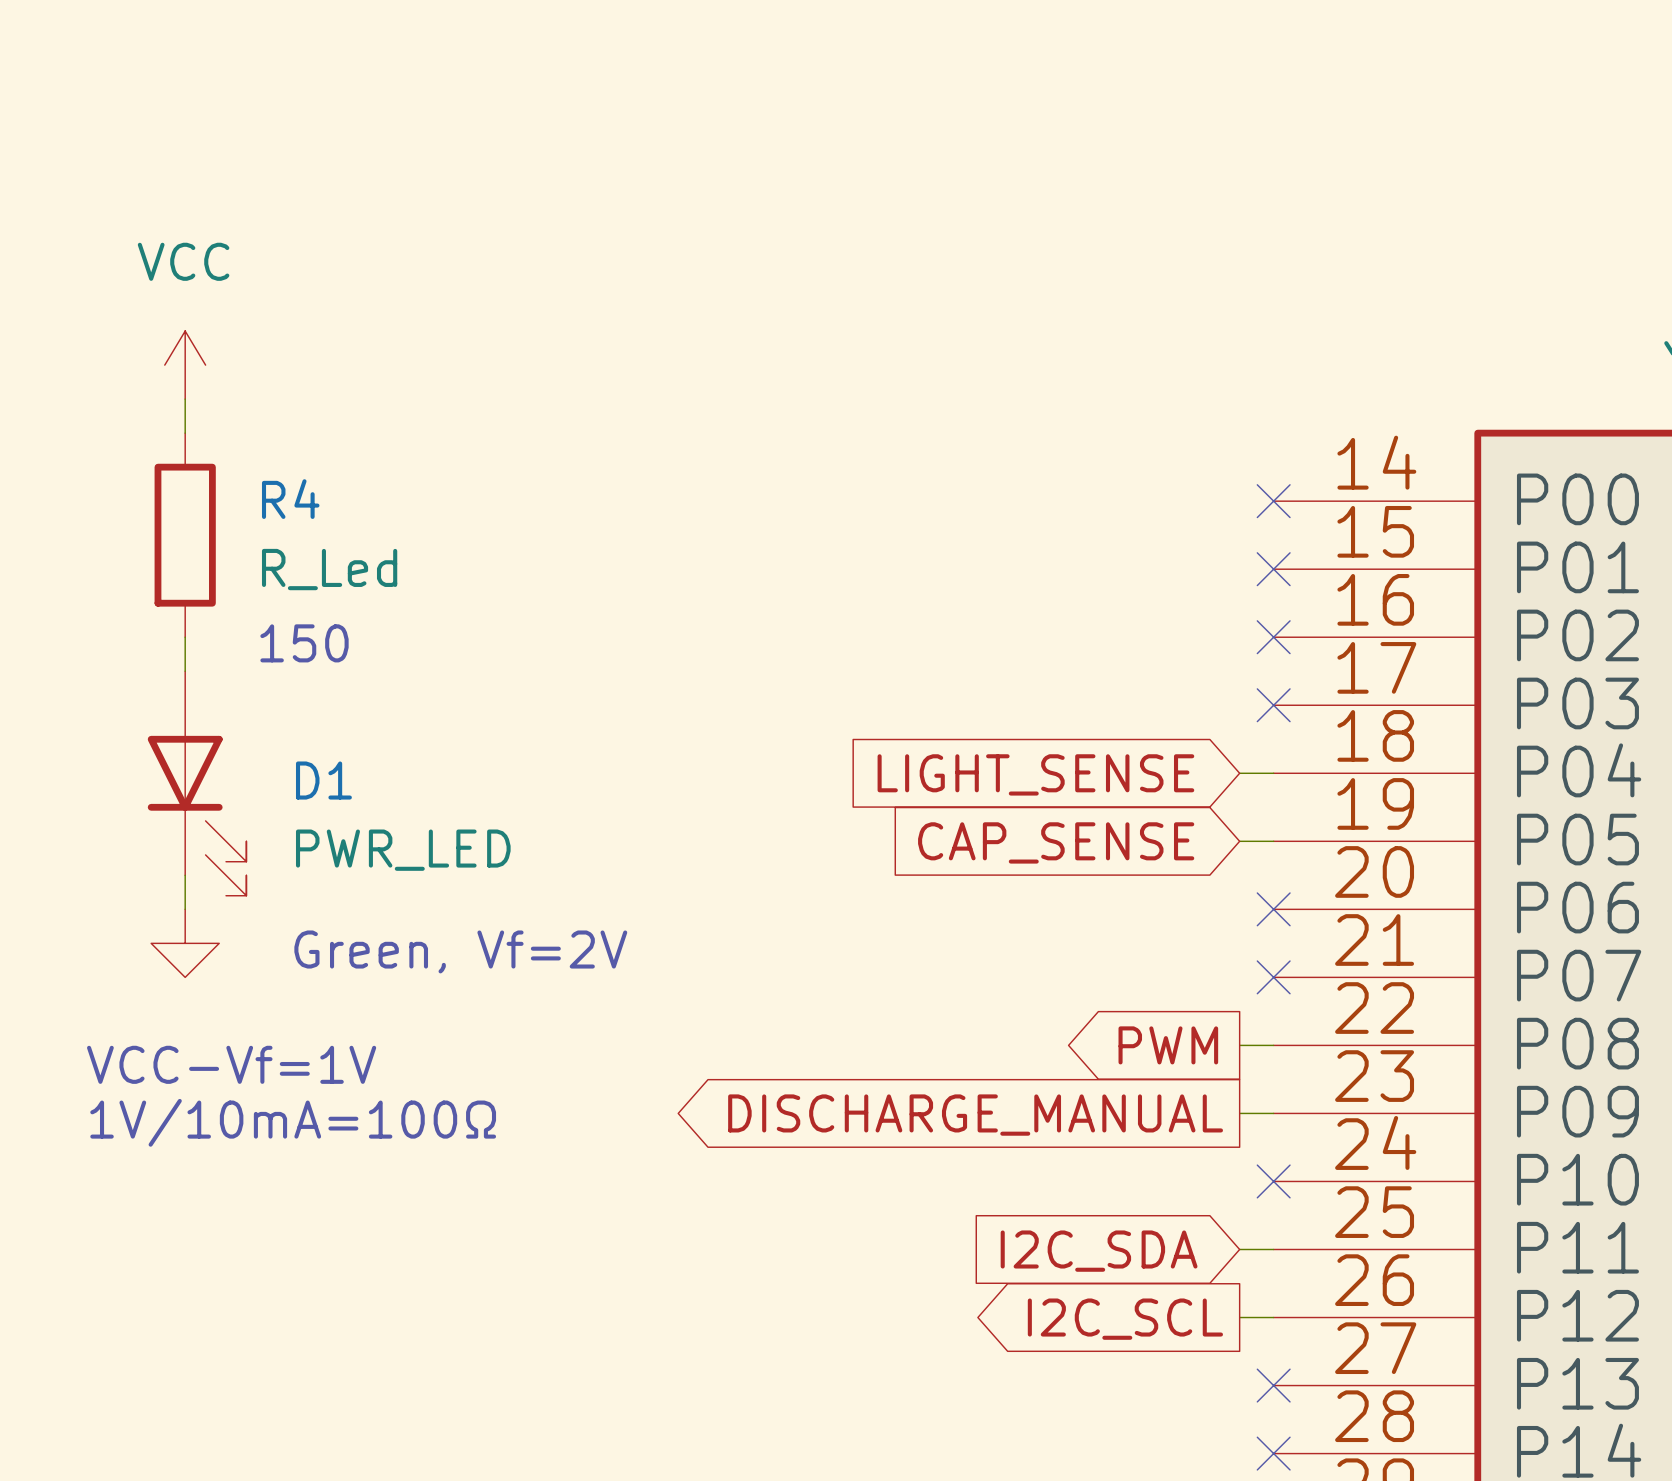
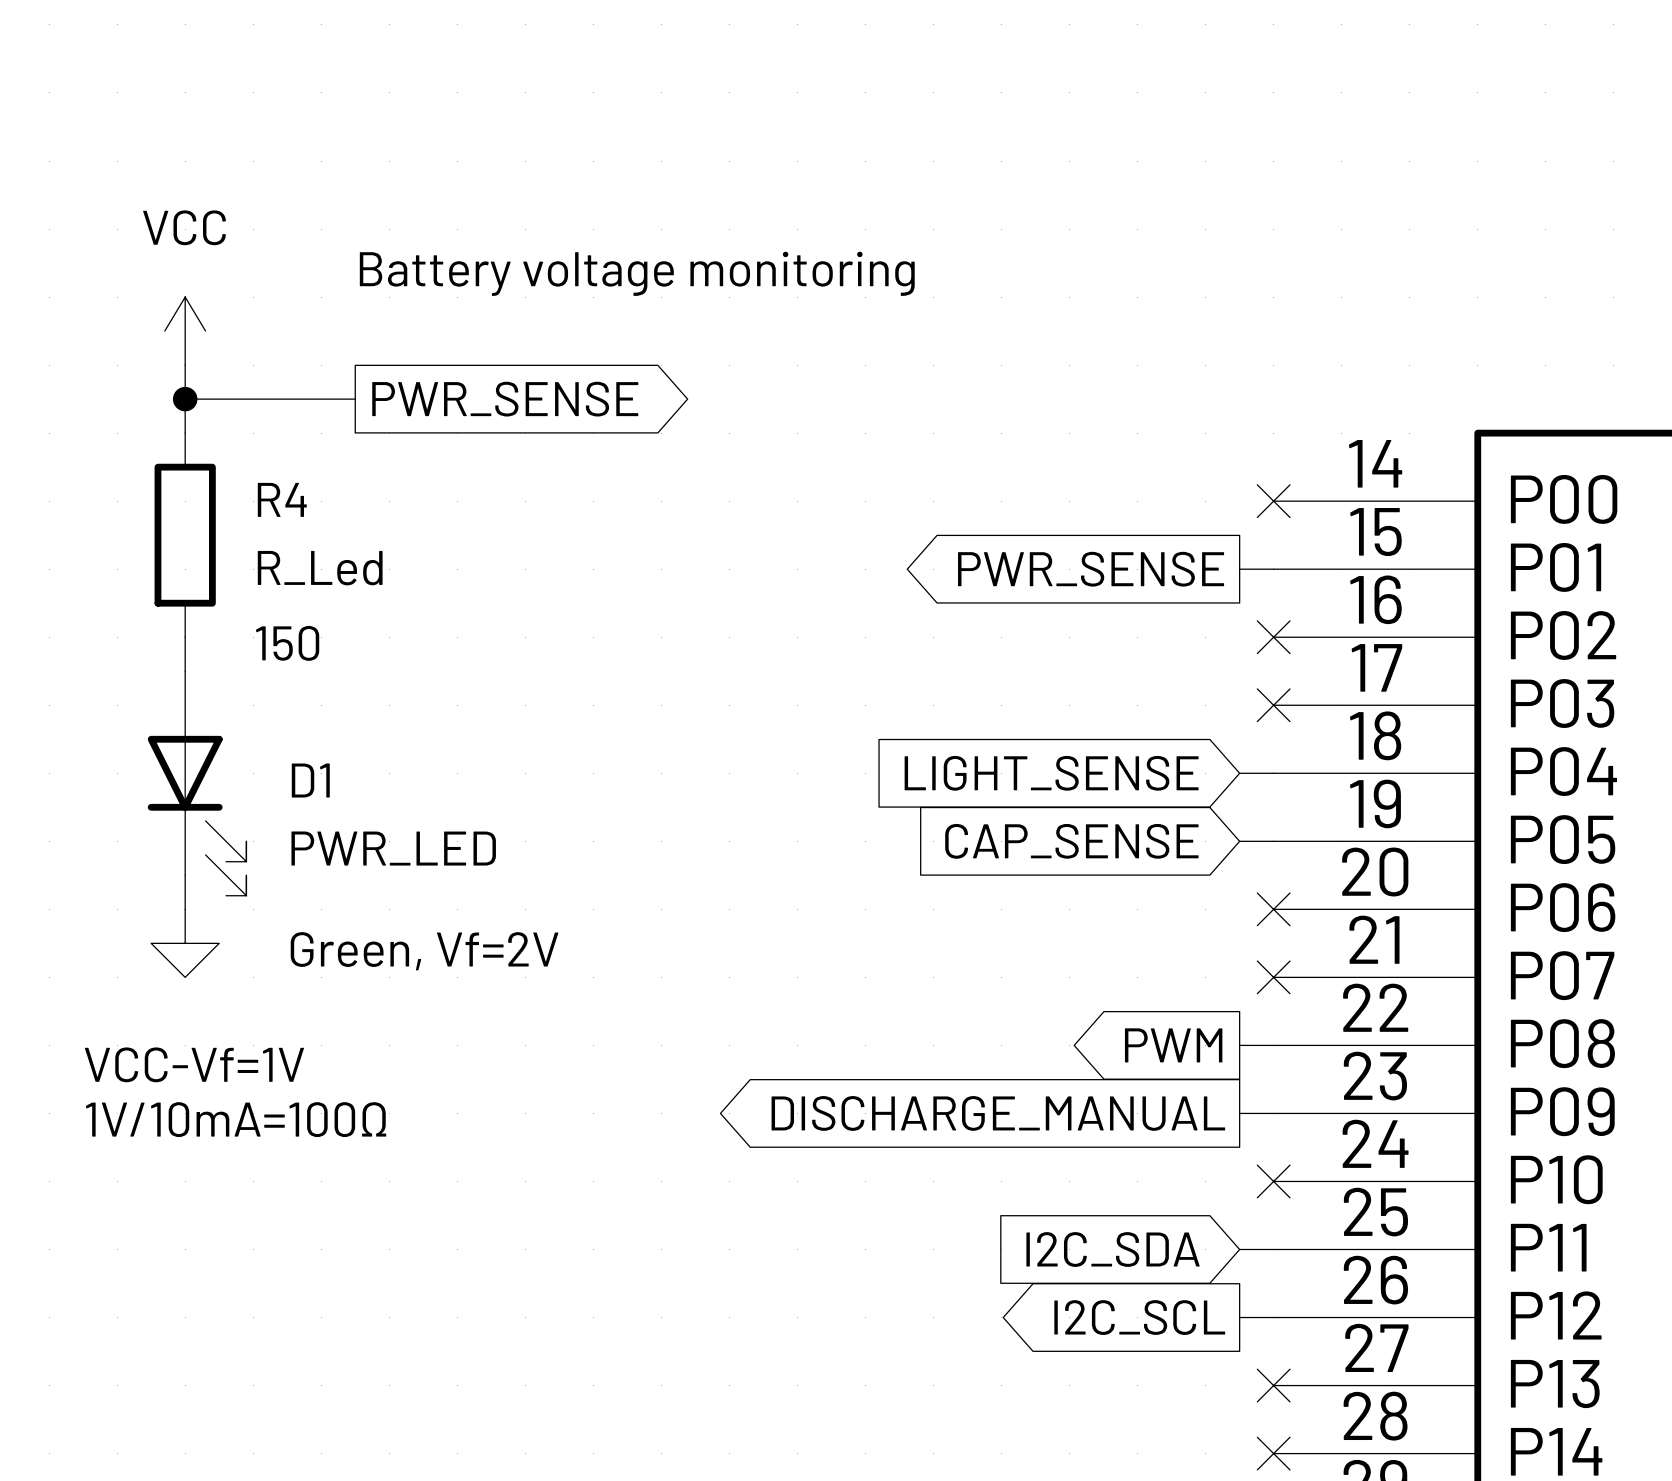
text: none -> Battery voltage monitoring (637, 273)
wire: none -> (185, 365) (185, 399) (355, 399)
power symbol position: VCC (185, 365) -> VCC (185, 331)
junction: none -> (185, 399)
global label: none -> PWR_SENSE (505, 399)
wire: none -> (1239, 569) (1273, 569)
no-connect mark: (1273, 569) -> none
global label: none -> PWR_SENSE (1091, 569)

